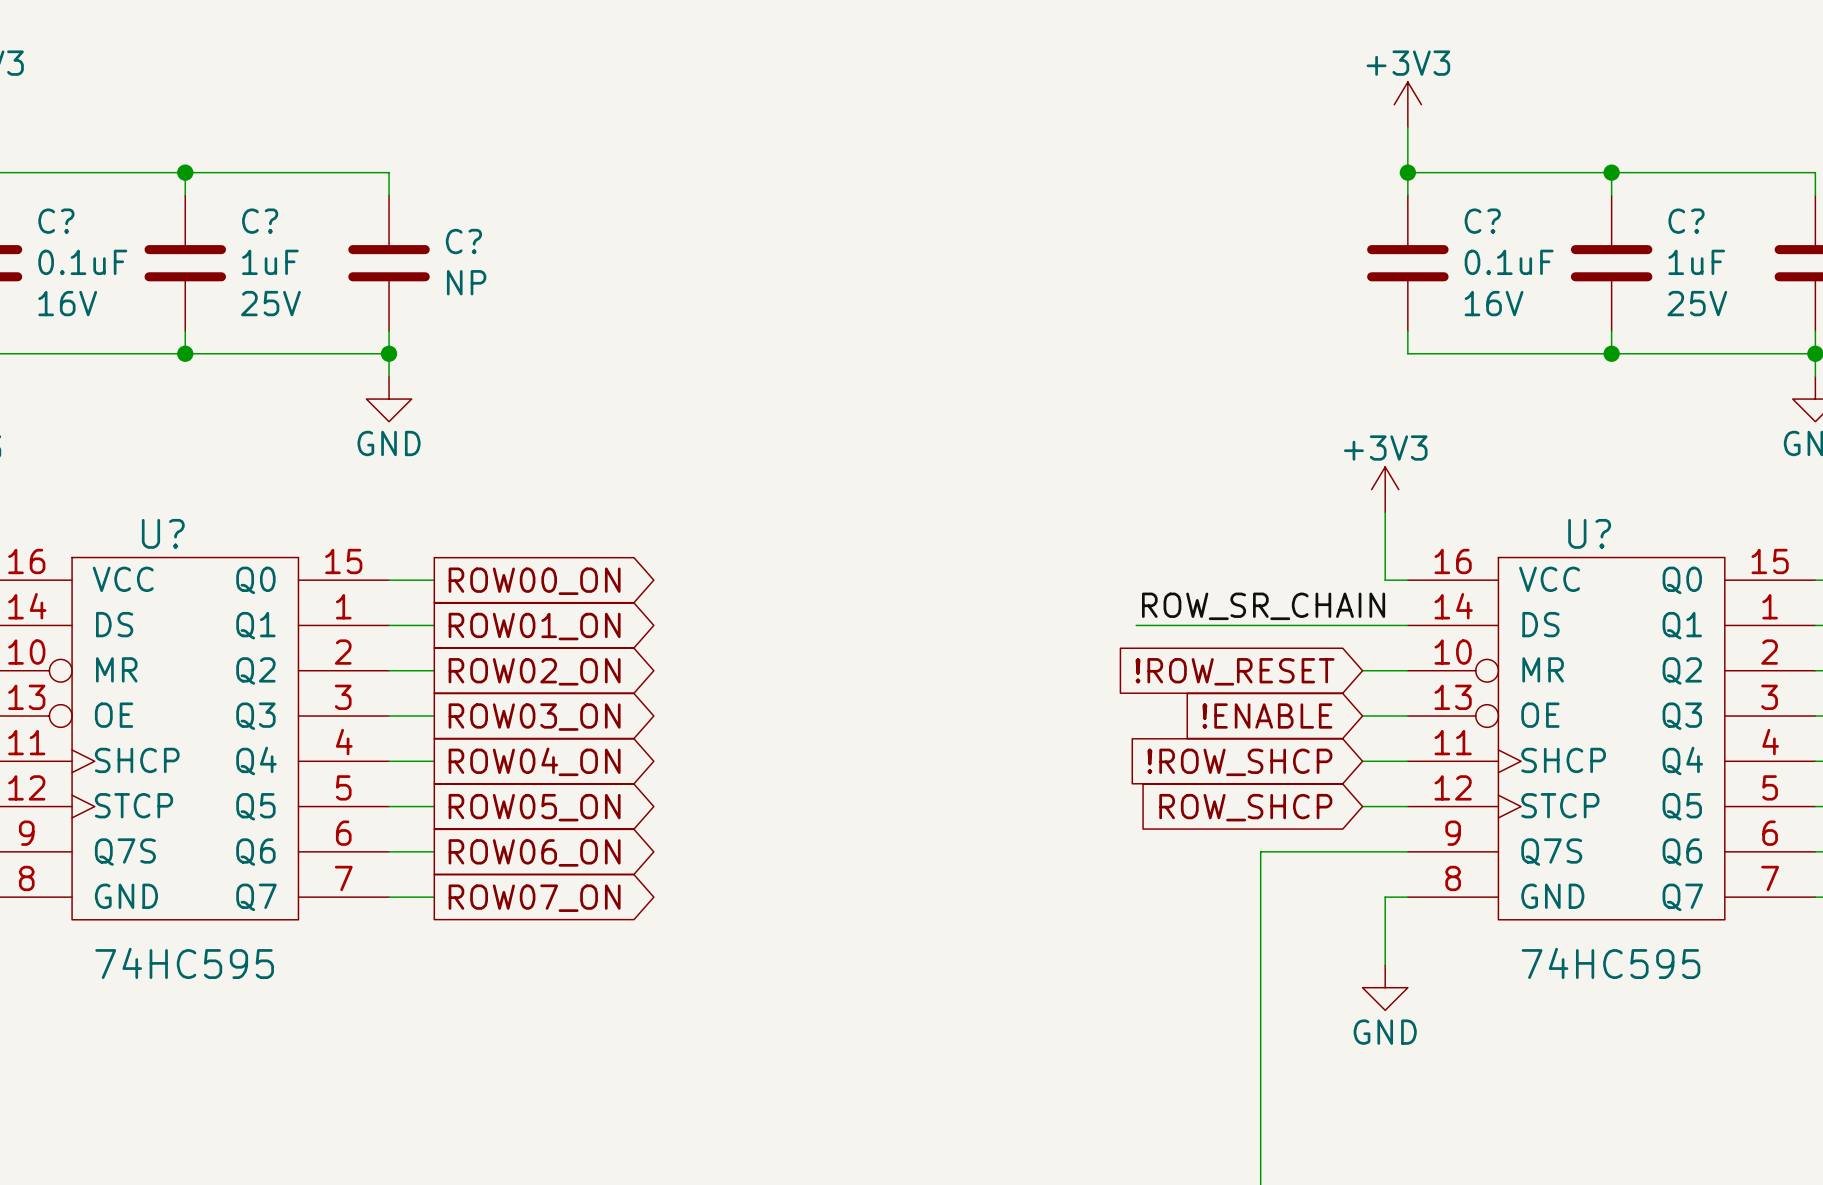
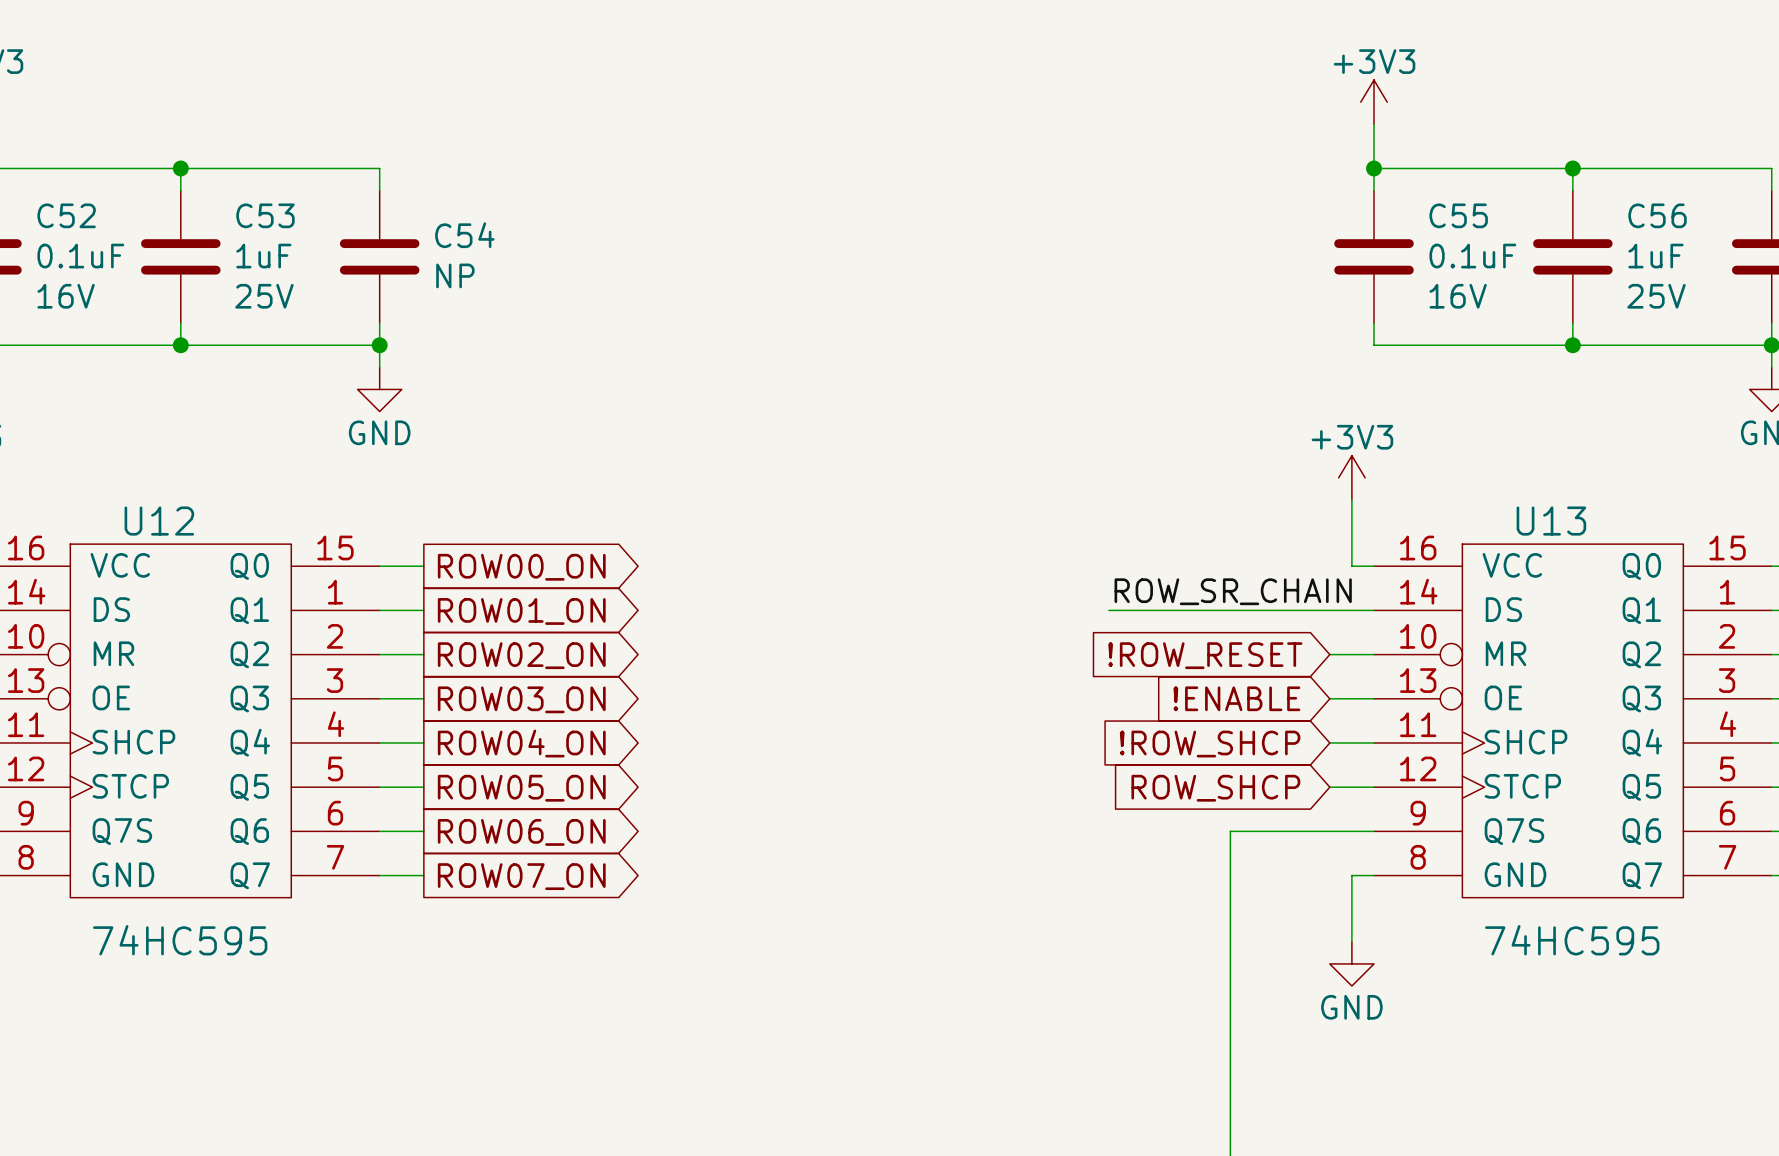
C? name: C? (56, 221) -> C52 (66, 215)
C? name: C? (260, 221) -> C53 (265, 215)
C? name: C? (1482, 221) -> C55 (1458, 215)
C? name: C? (1686, 221) -> C56 (1657, 215)
C? name: C? (463, 241) -> C54 (464, 235)
U? name: U? (163, 533) -> U12 (159, 521)
U? name: U? (1589, 533) -> U13 (1551, 521)

